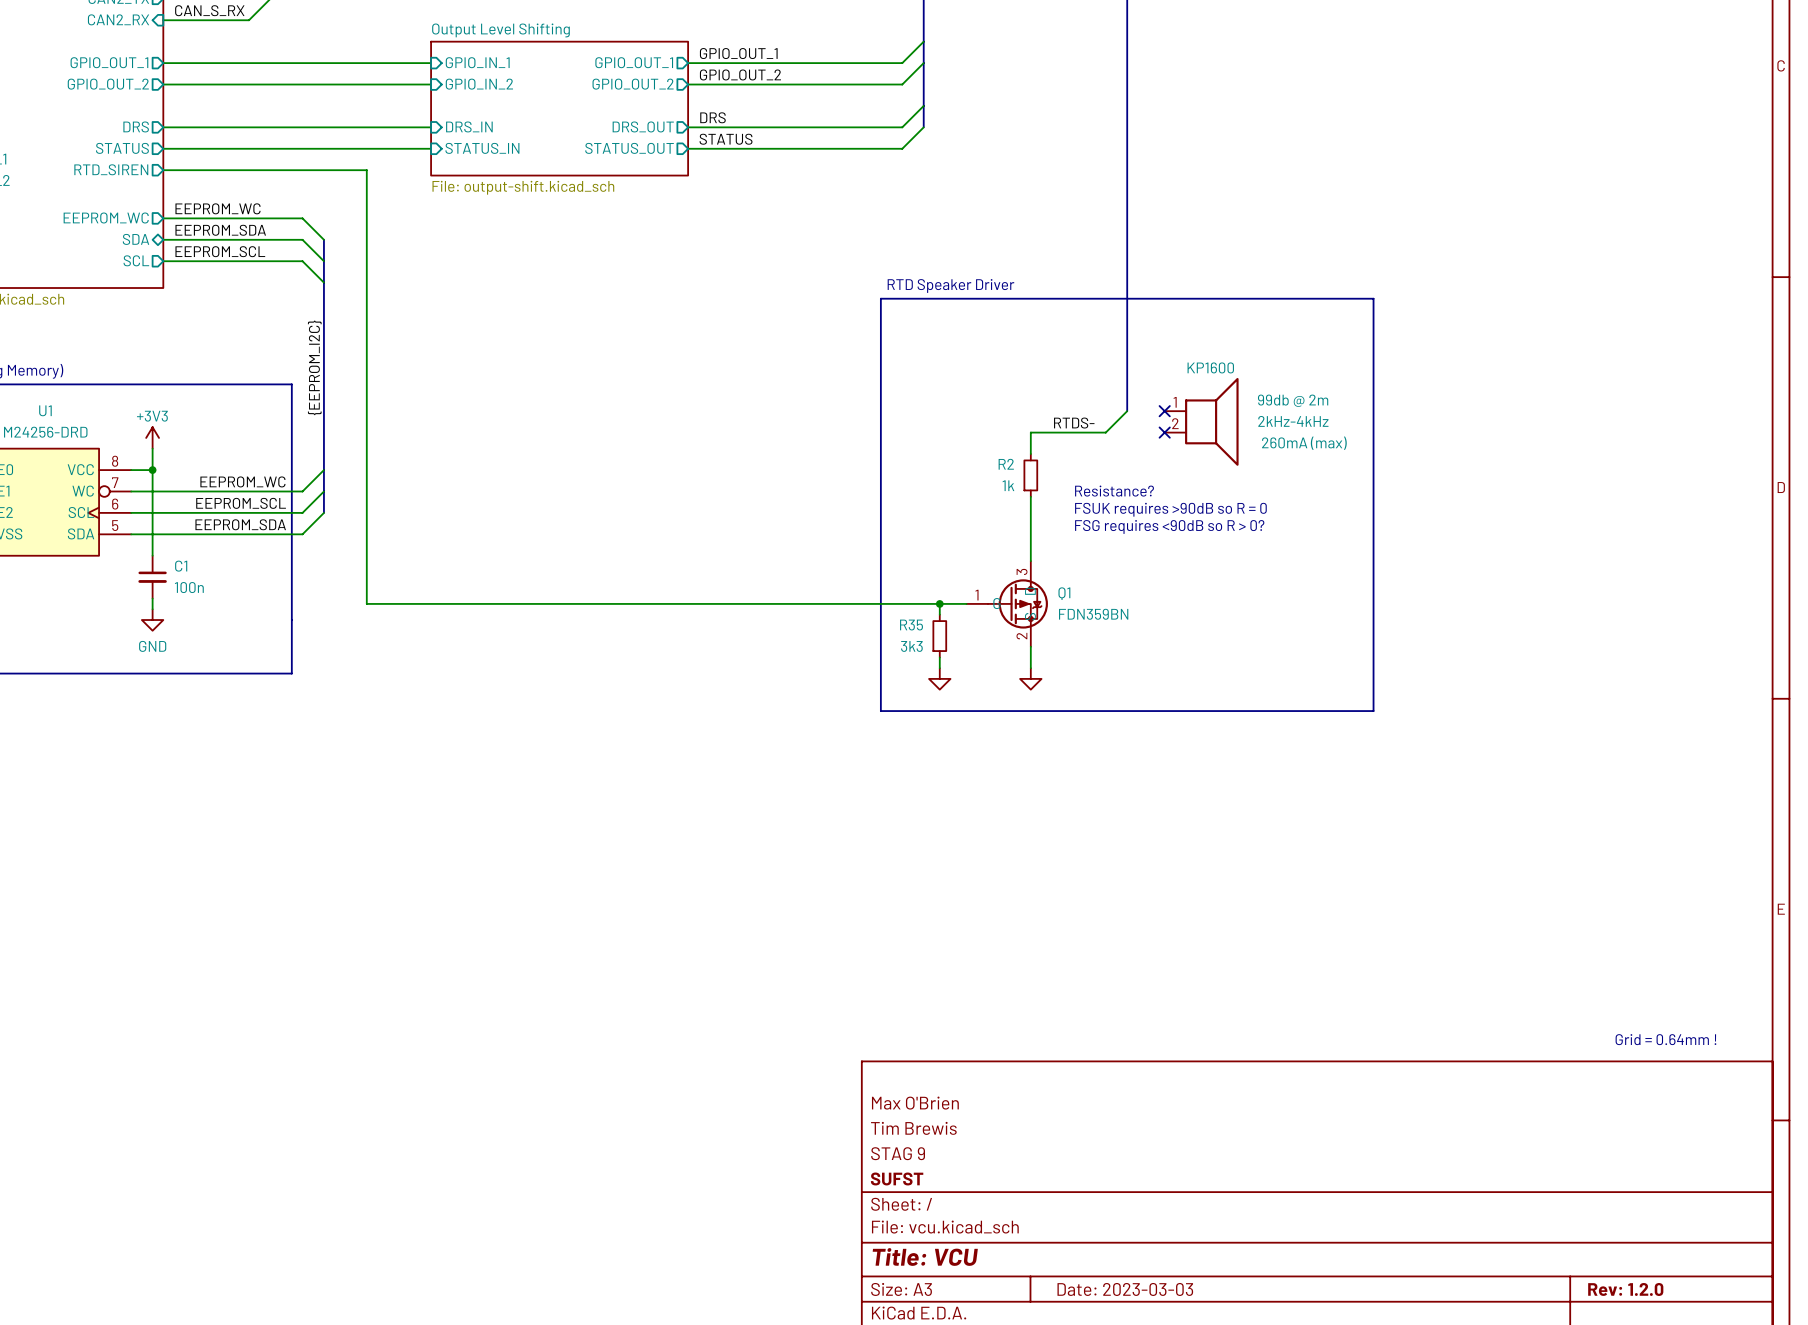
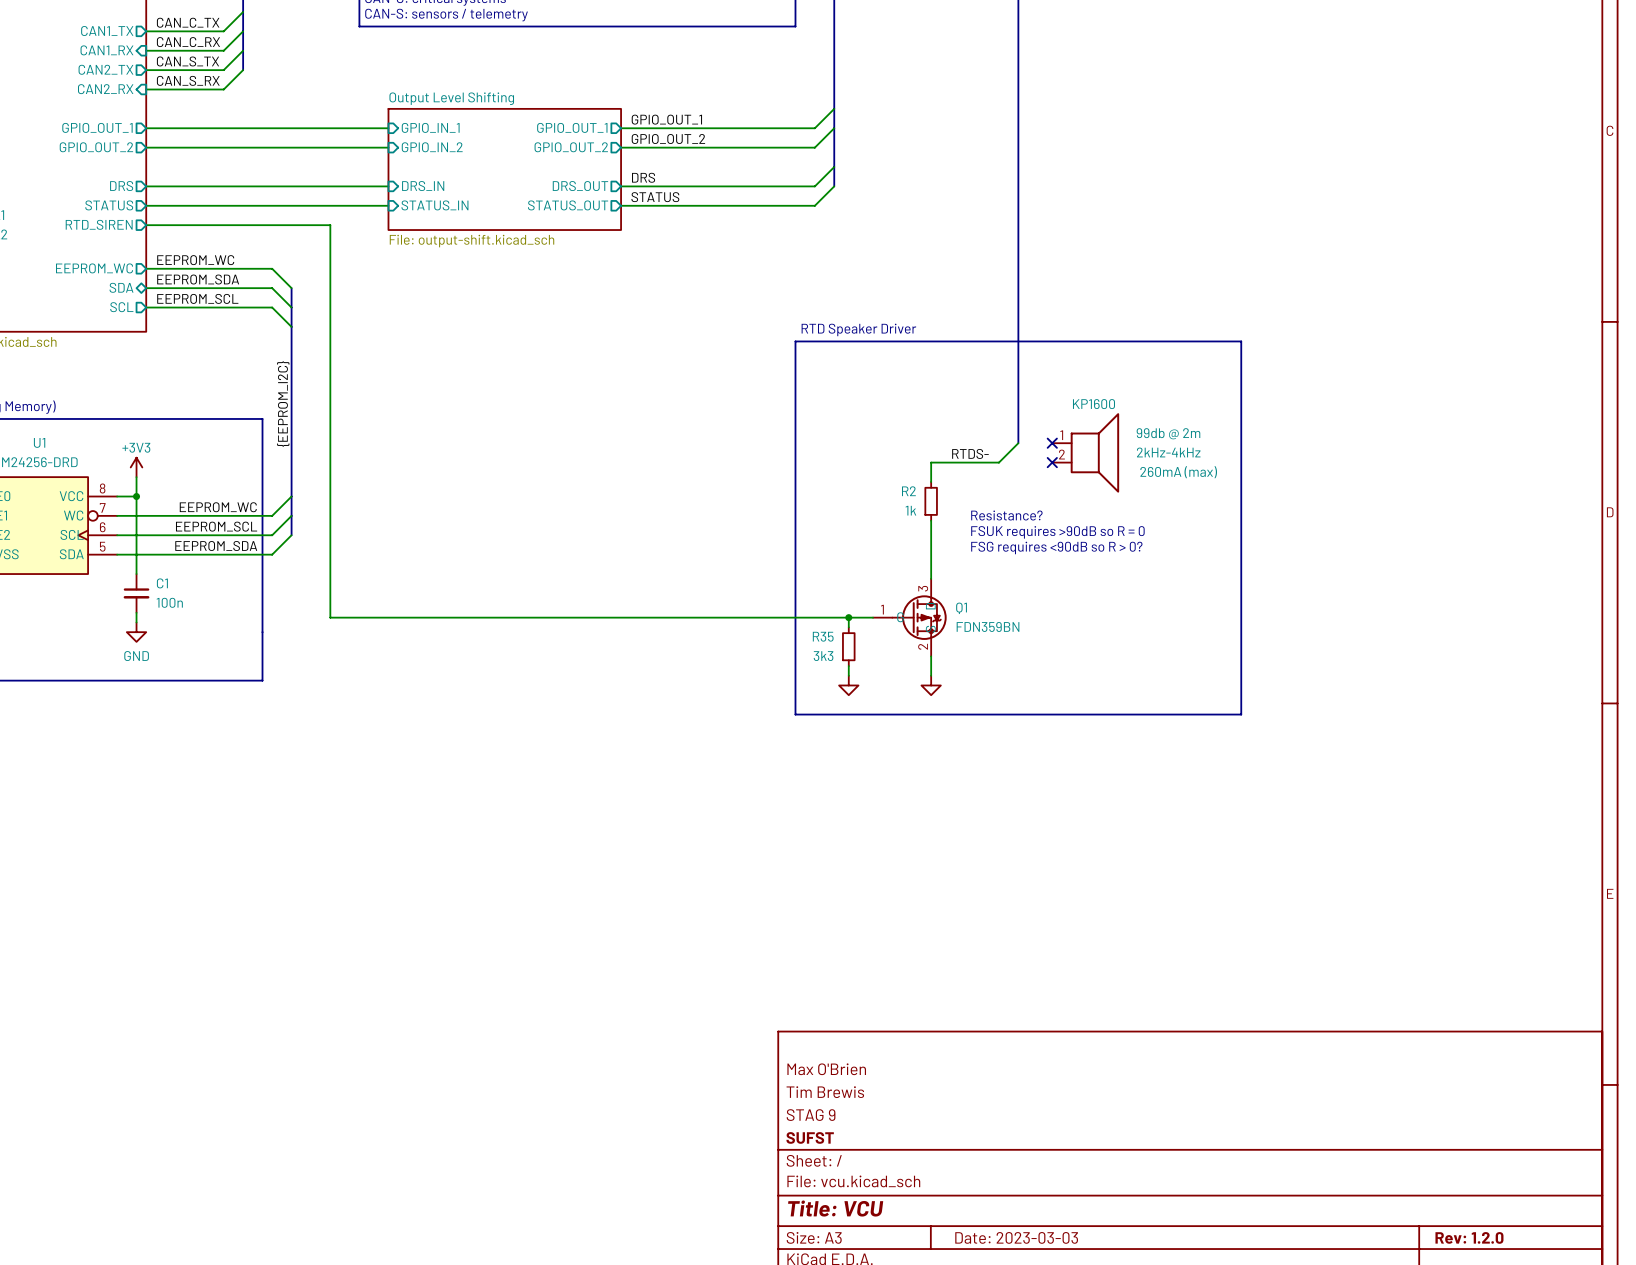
text: Grid = 0.64mm ! (1665, 1039) -> none

